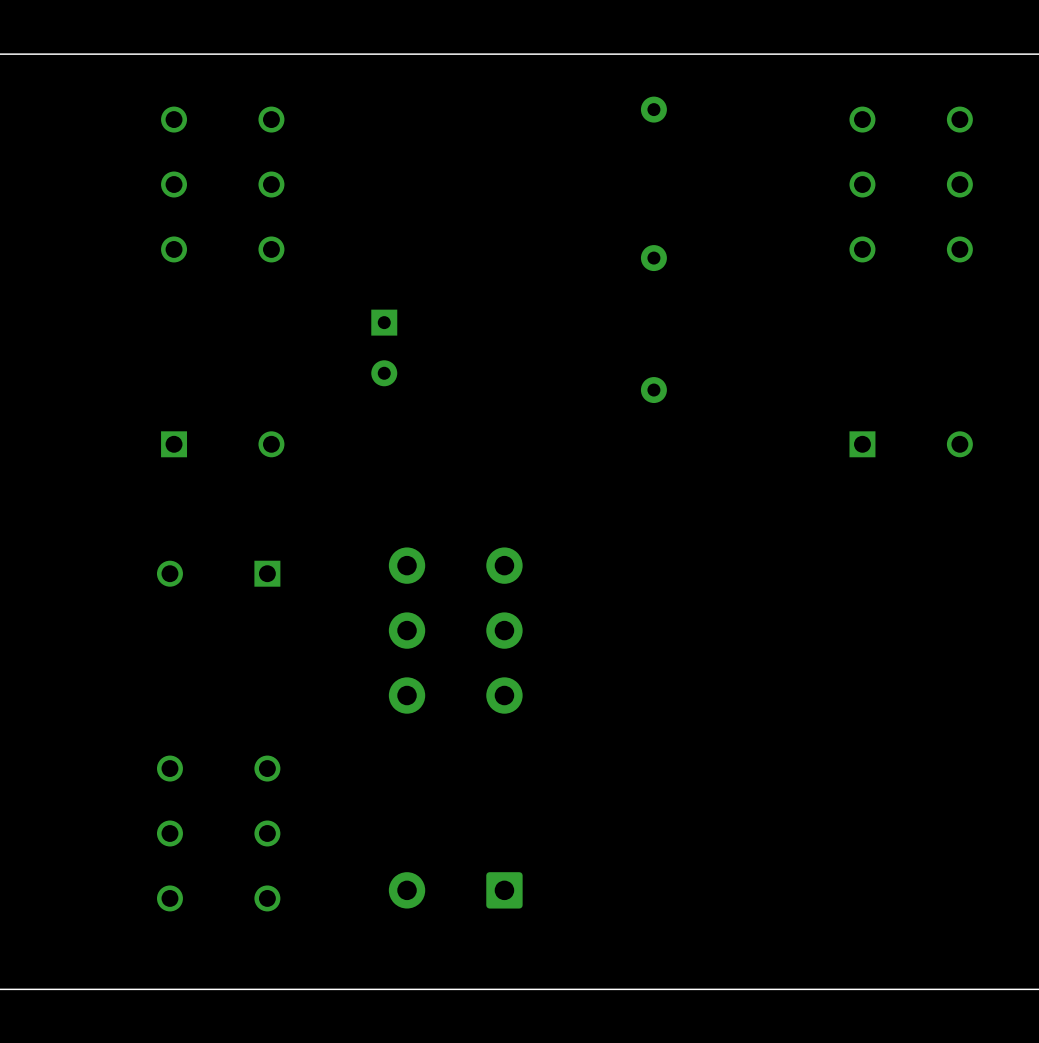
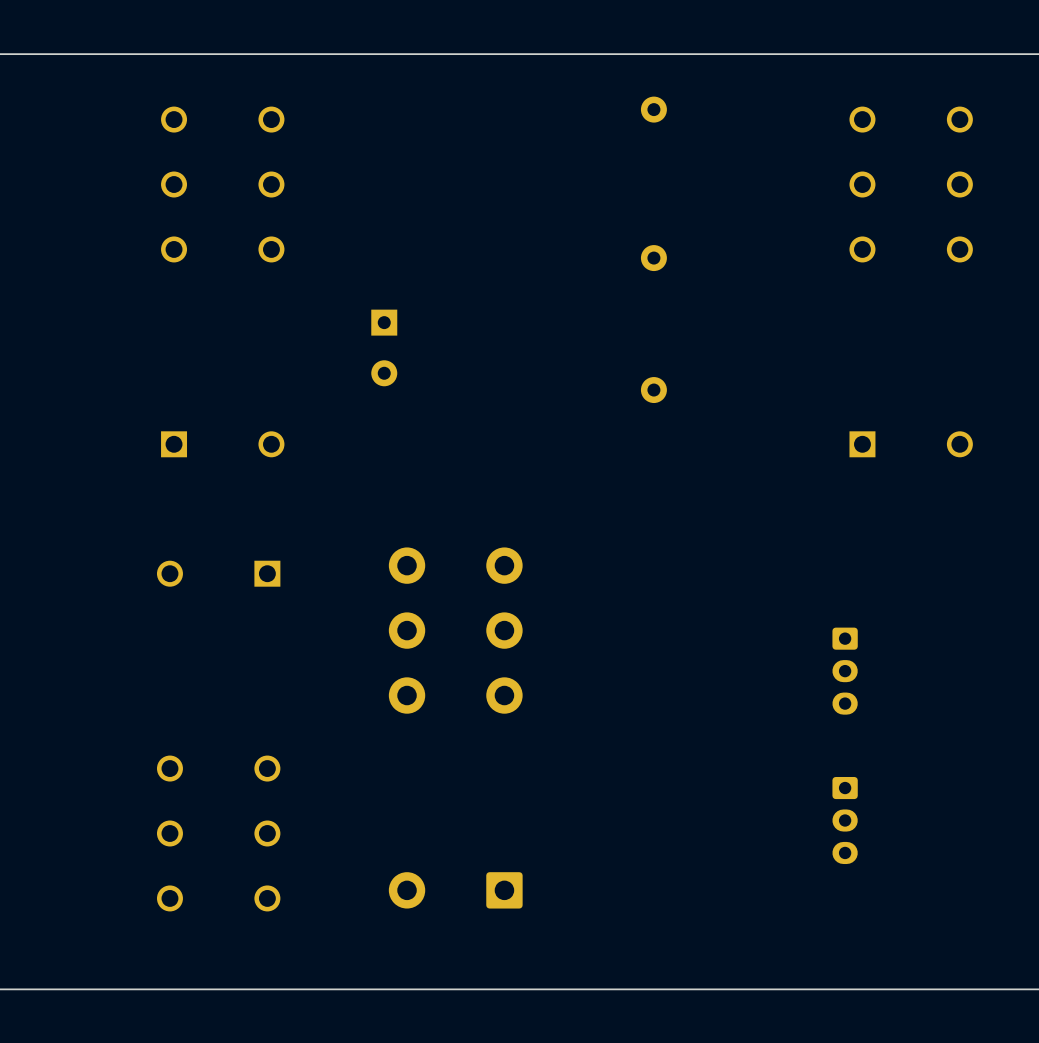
part: none -> (845, 671)
part: none -> (845, 820)

